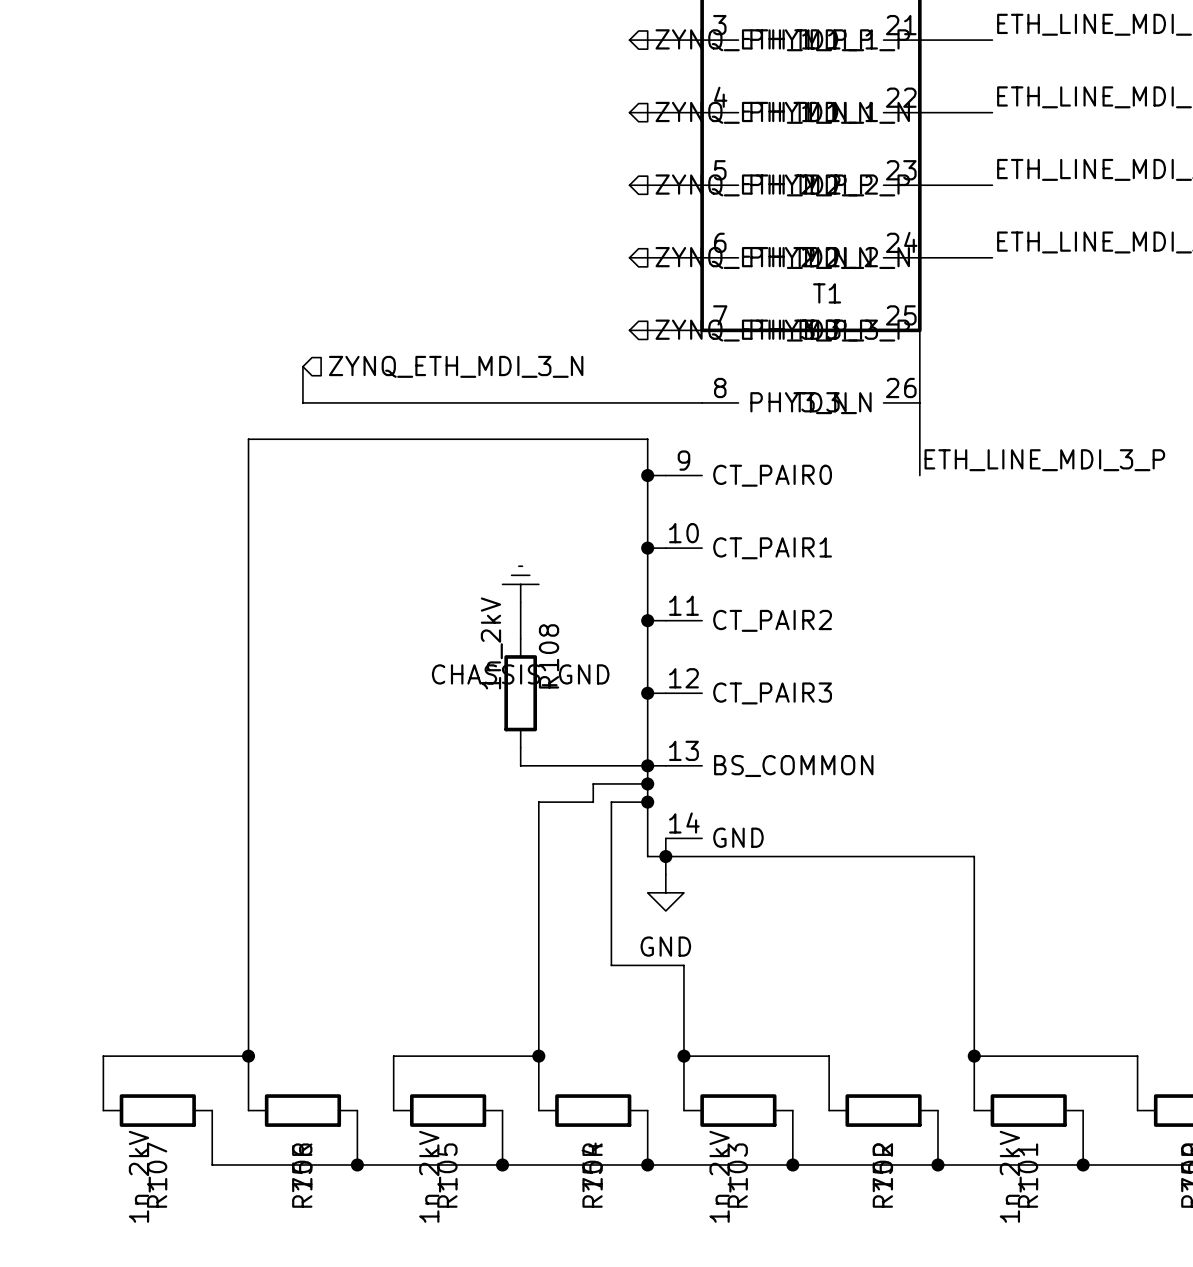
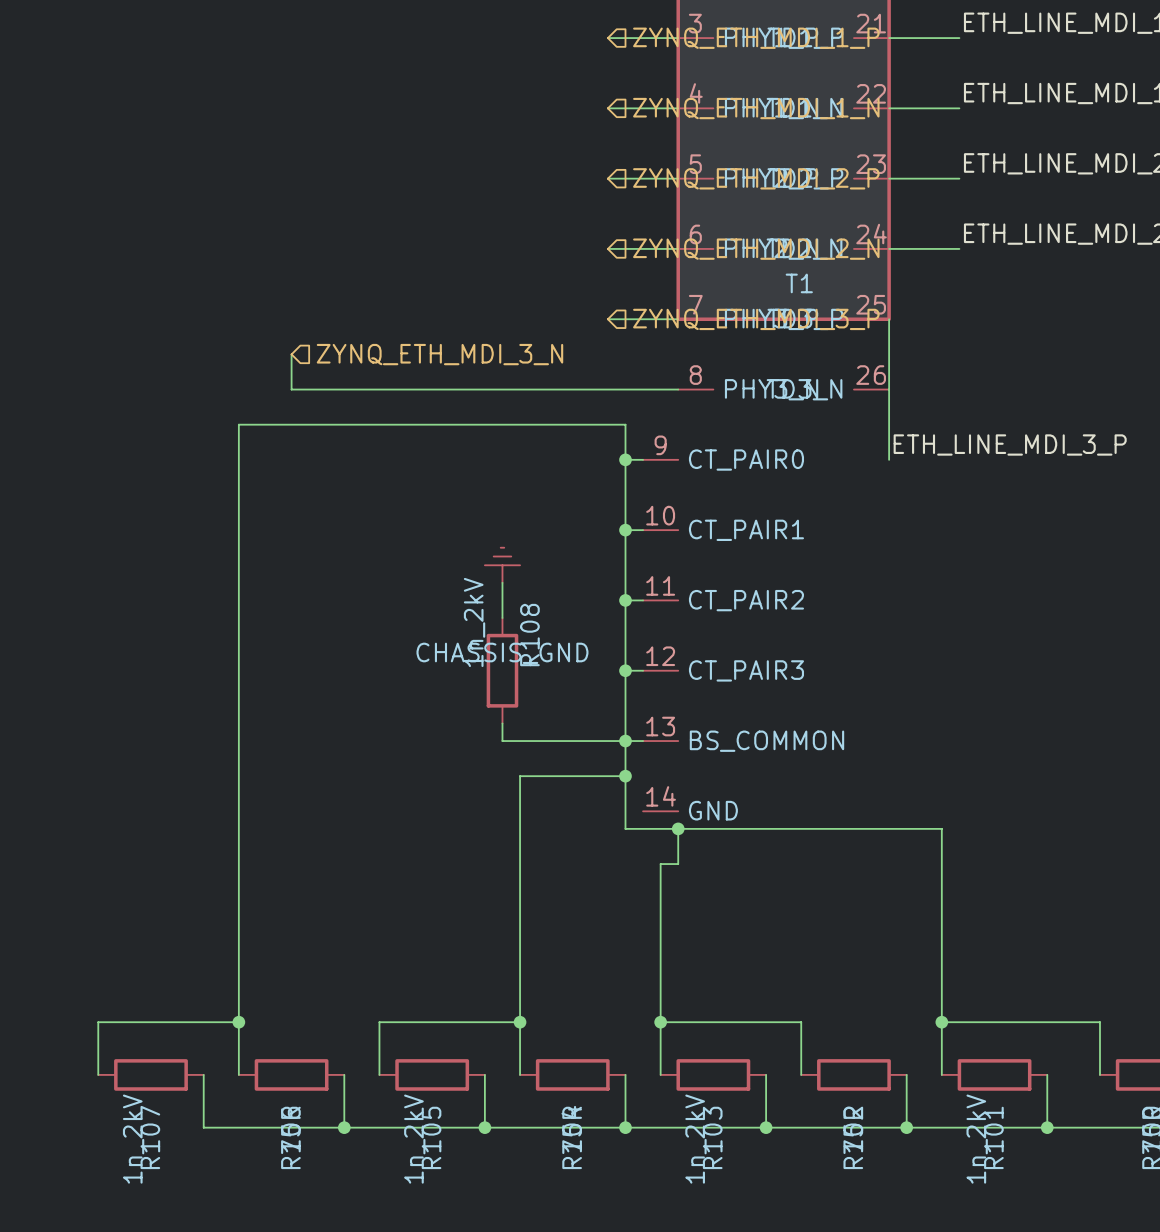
wire: (647, 783) (593, 783) (593, 802) -> (590, 776) (572, 776)
junction: (647, 783) -> none
wire: (611, 802) (611, 965) (683, 965) -> (678, 828) (678, 864) (660, 864) (660, 934)
wire: (665, 838) (665, 874) -> none
junction position: (665, 856) -> (678, 828)
power symbol: GND (665, 892) -> none

